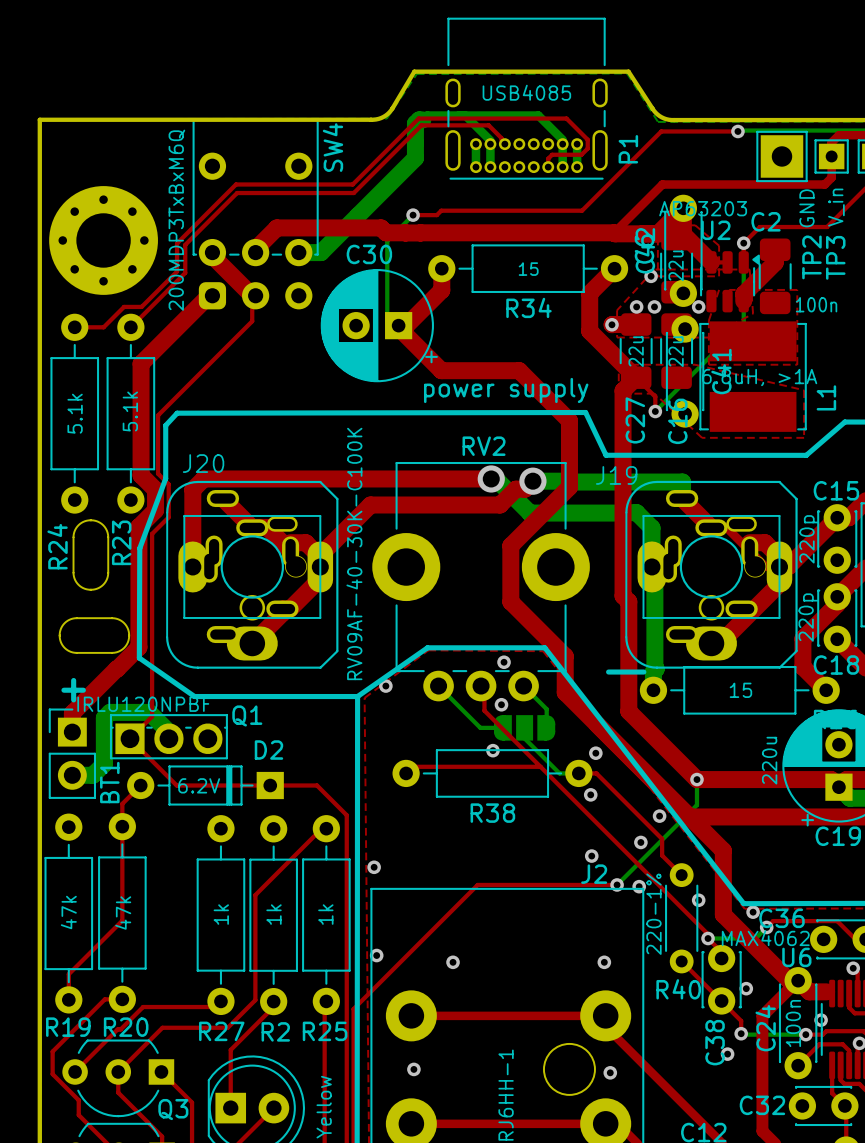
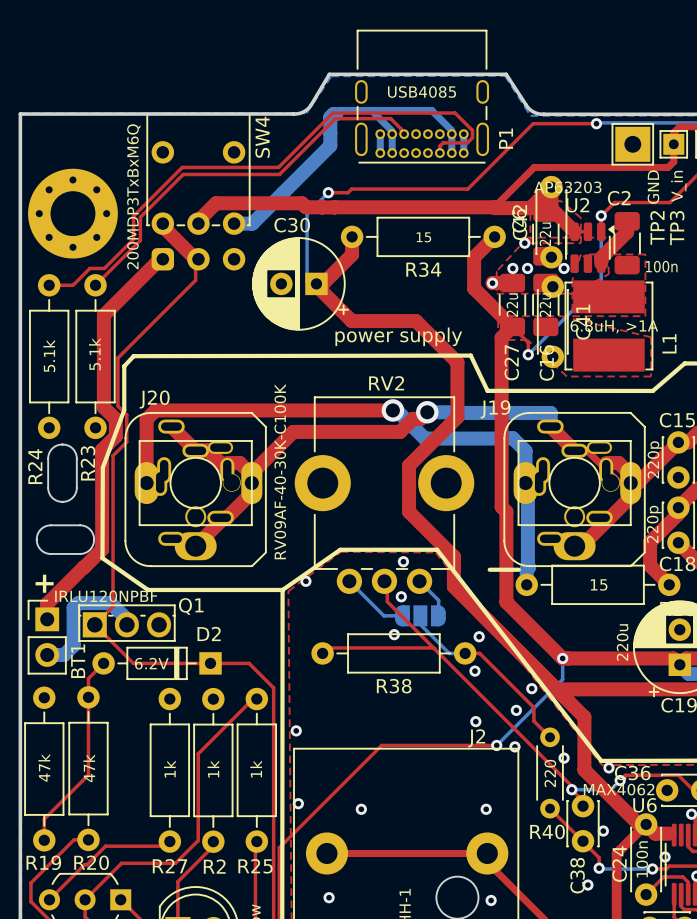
R40 value: 220-1% (653, 914) -> 220 (550, 773)

